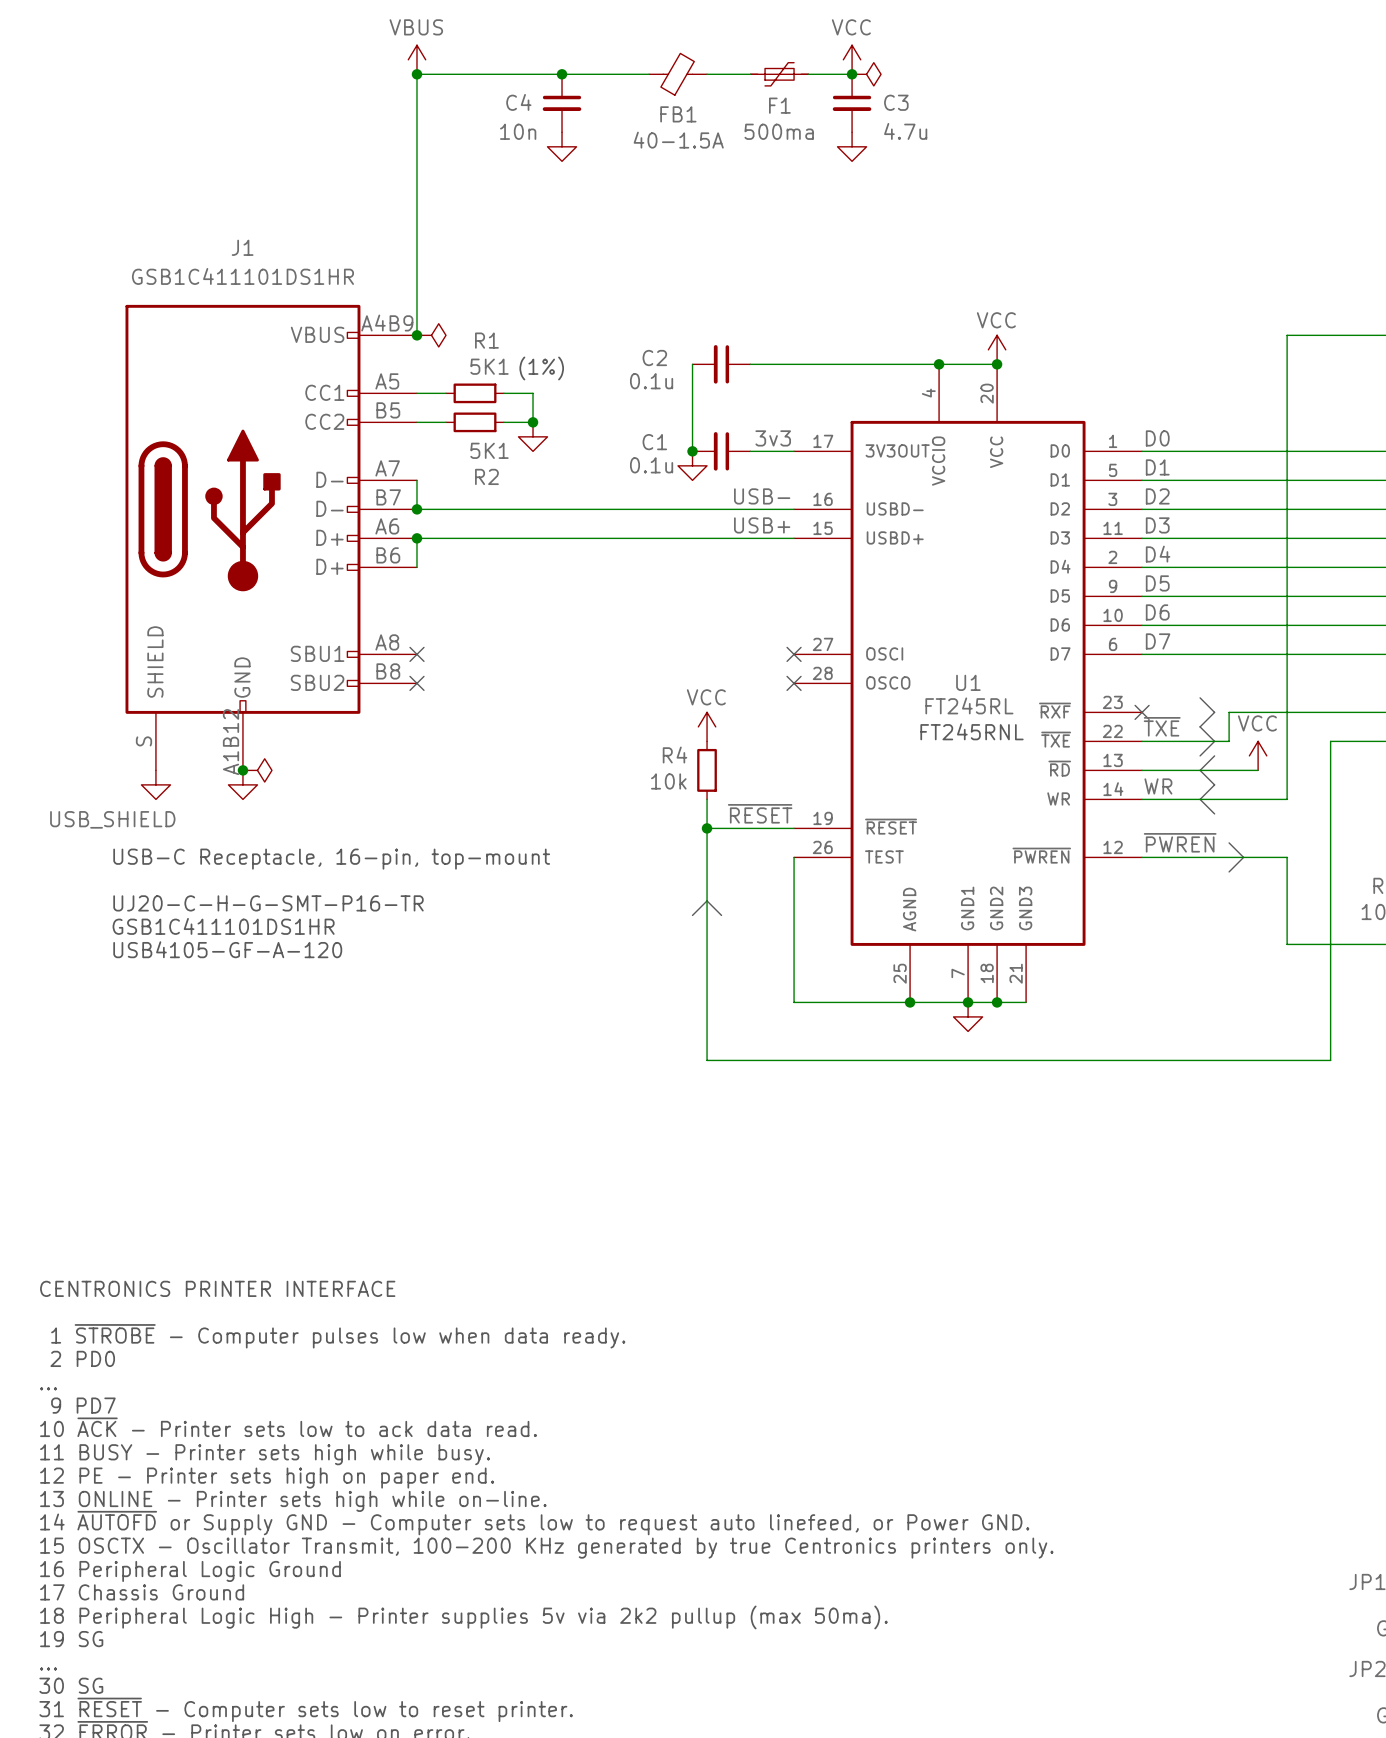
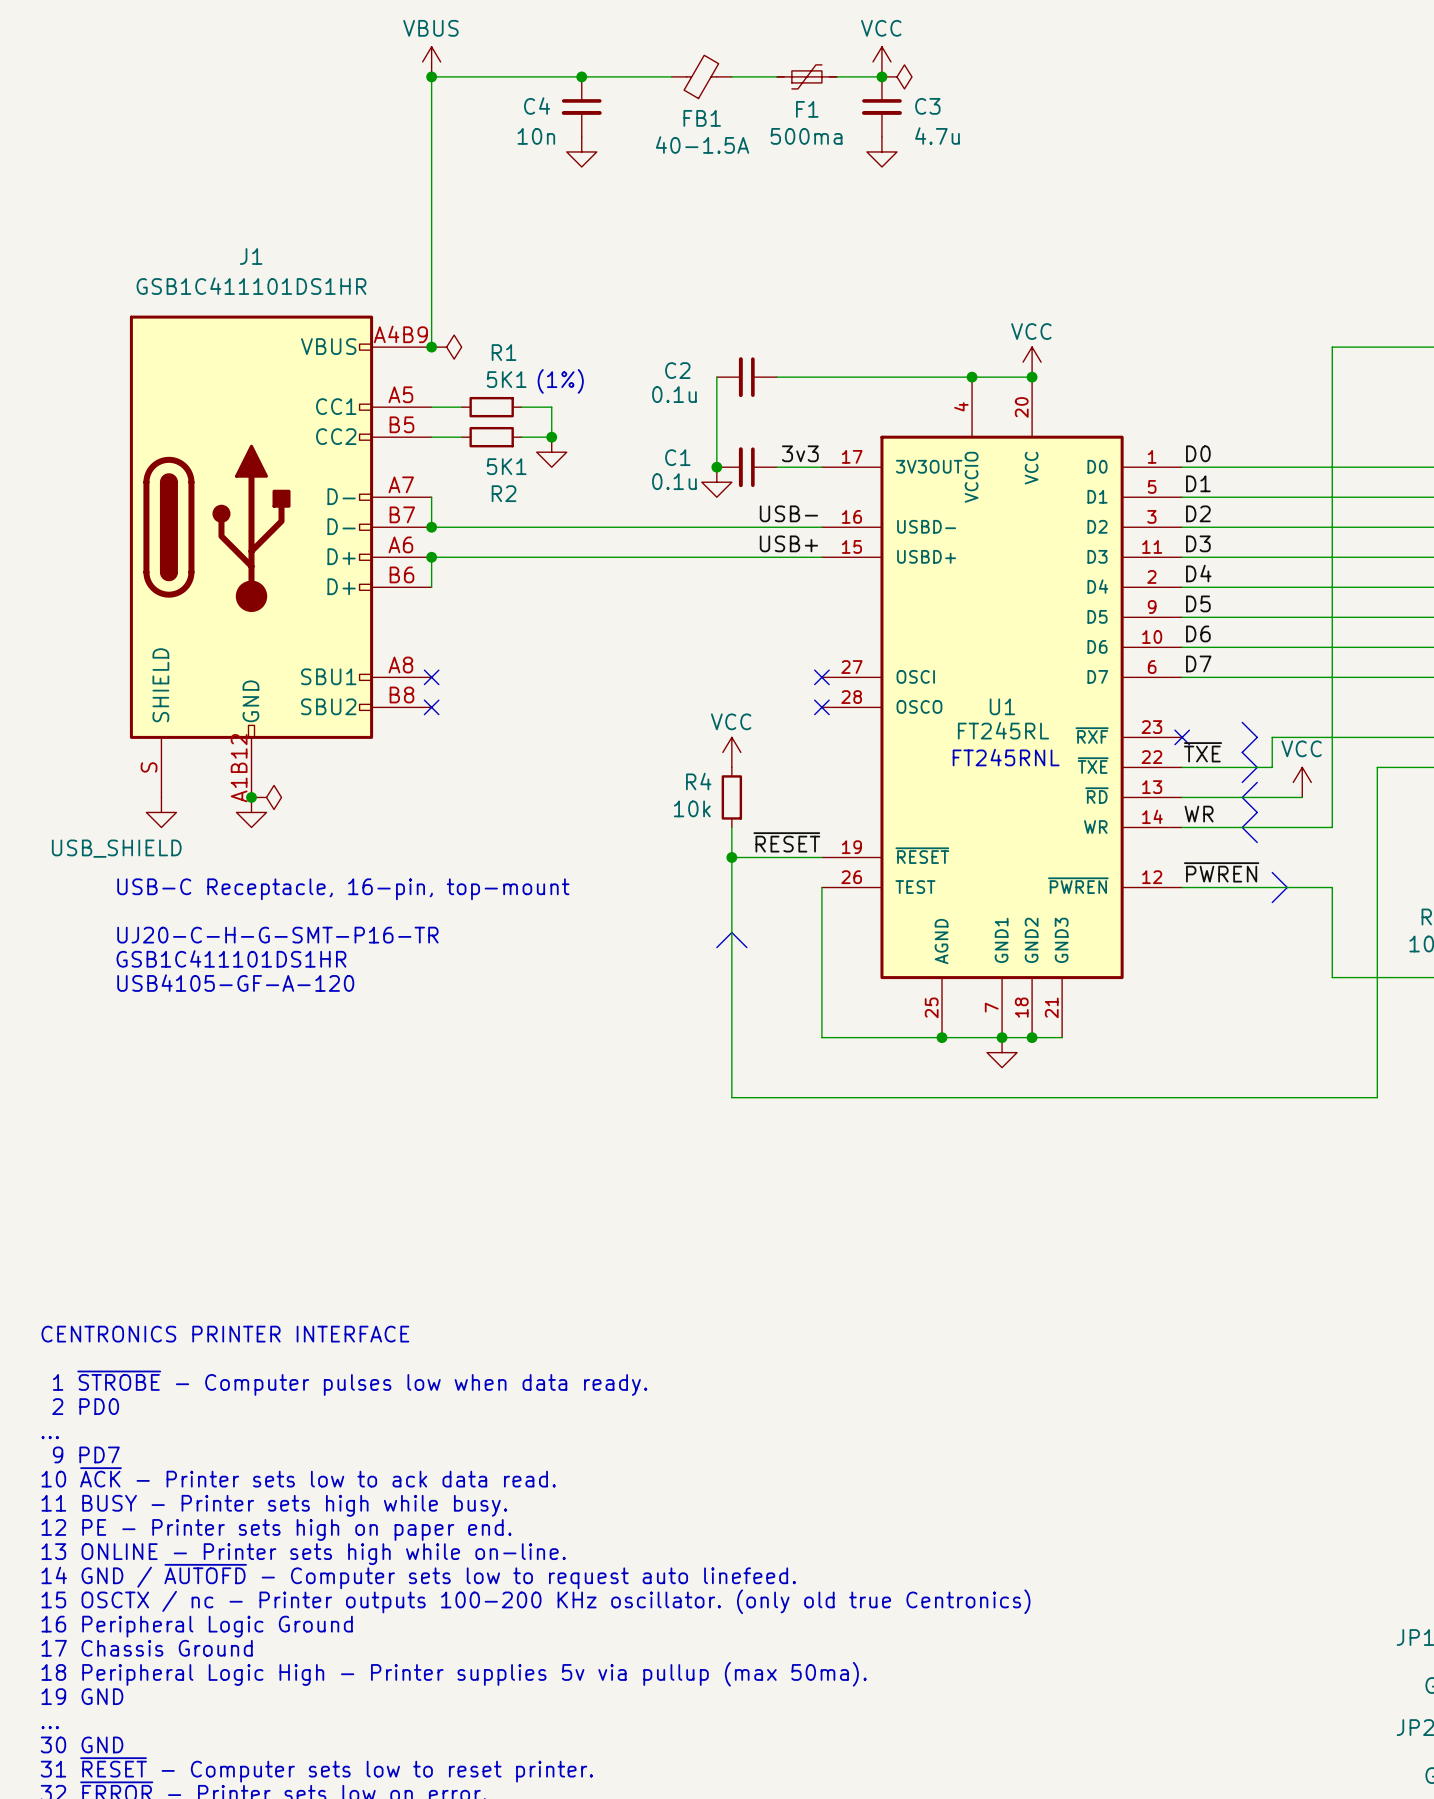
text: 14 ~{AUTOFD} or Supply GND - Computer sets low to request auto linefeed, or Power GND. (534, 1523) -> 14 GND / ~{AUTOFD} - Computer sets low to request auto linefeed. (418, 1576)
text: 15 OSCTX - Oscillator Transmit, 100-200 KHz generated by true Centronics printers only. (546, 1548) -> 15 OSCTX / nc - Printer outputs 100-200 KHz oscillator. (only old true Centronics) (535, 1601)
text: 18 Peripheral Logic High - Printer supplies 5v via 2k2 pullup (max 50ma). (463, 1617) -> 18 Peripheral Logic High - Printer supplies 5v via pullup (max 50ma). (454, 1674)
text: 19 SG (71, 1639) -> 19 GND (82, 1696)
text: 30 SG (71, 1685) -> 30 GND (82, 1744)

